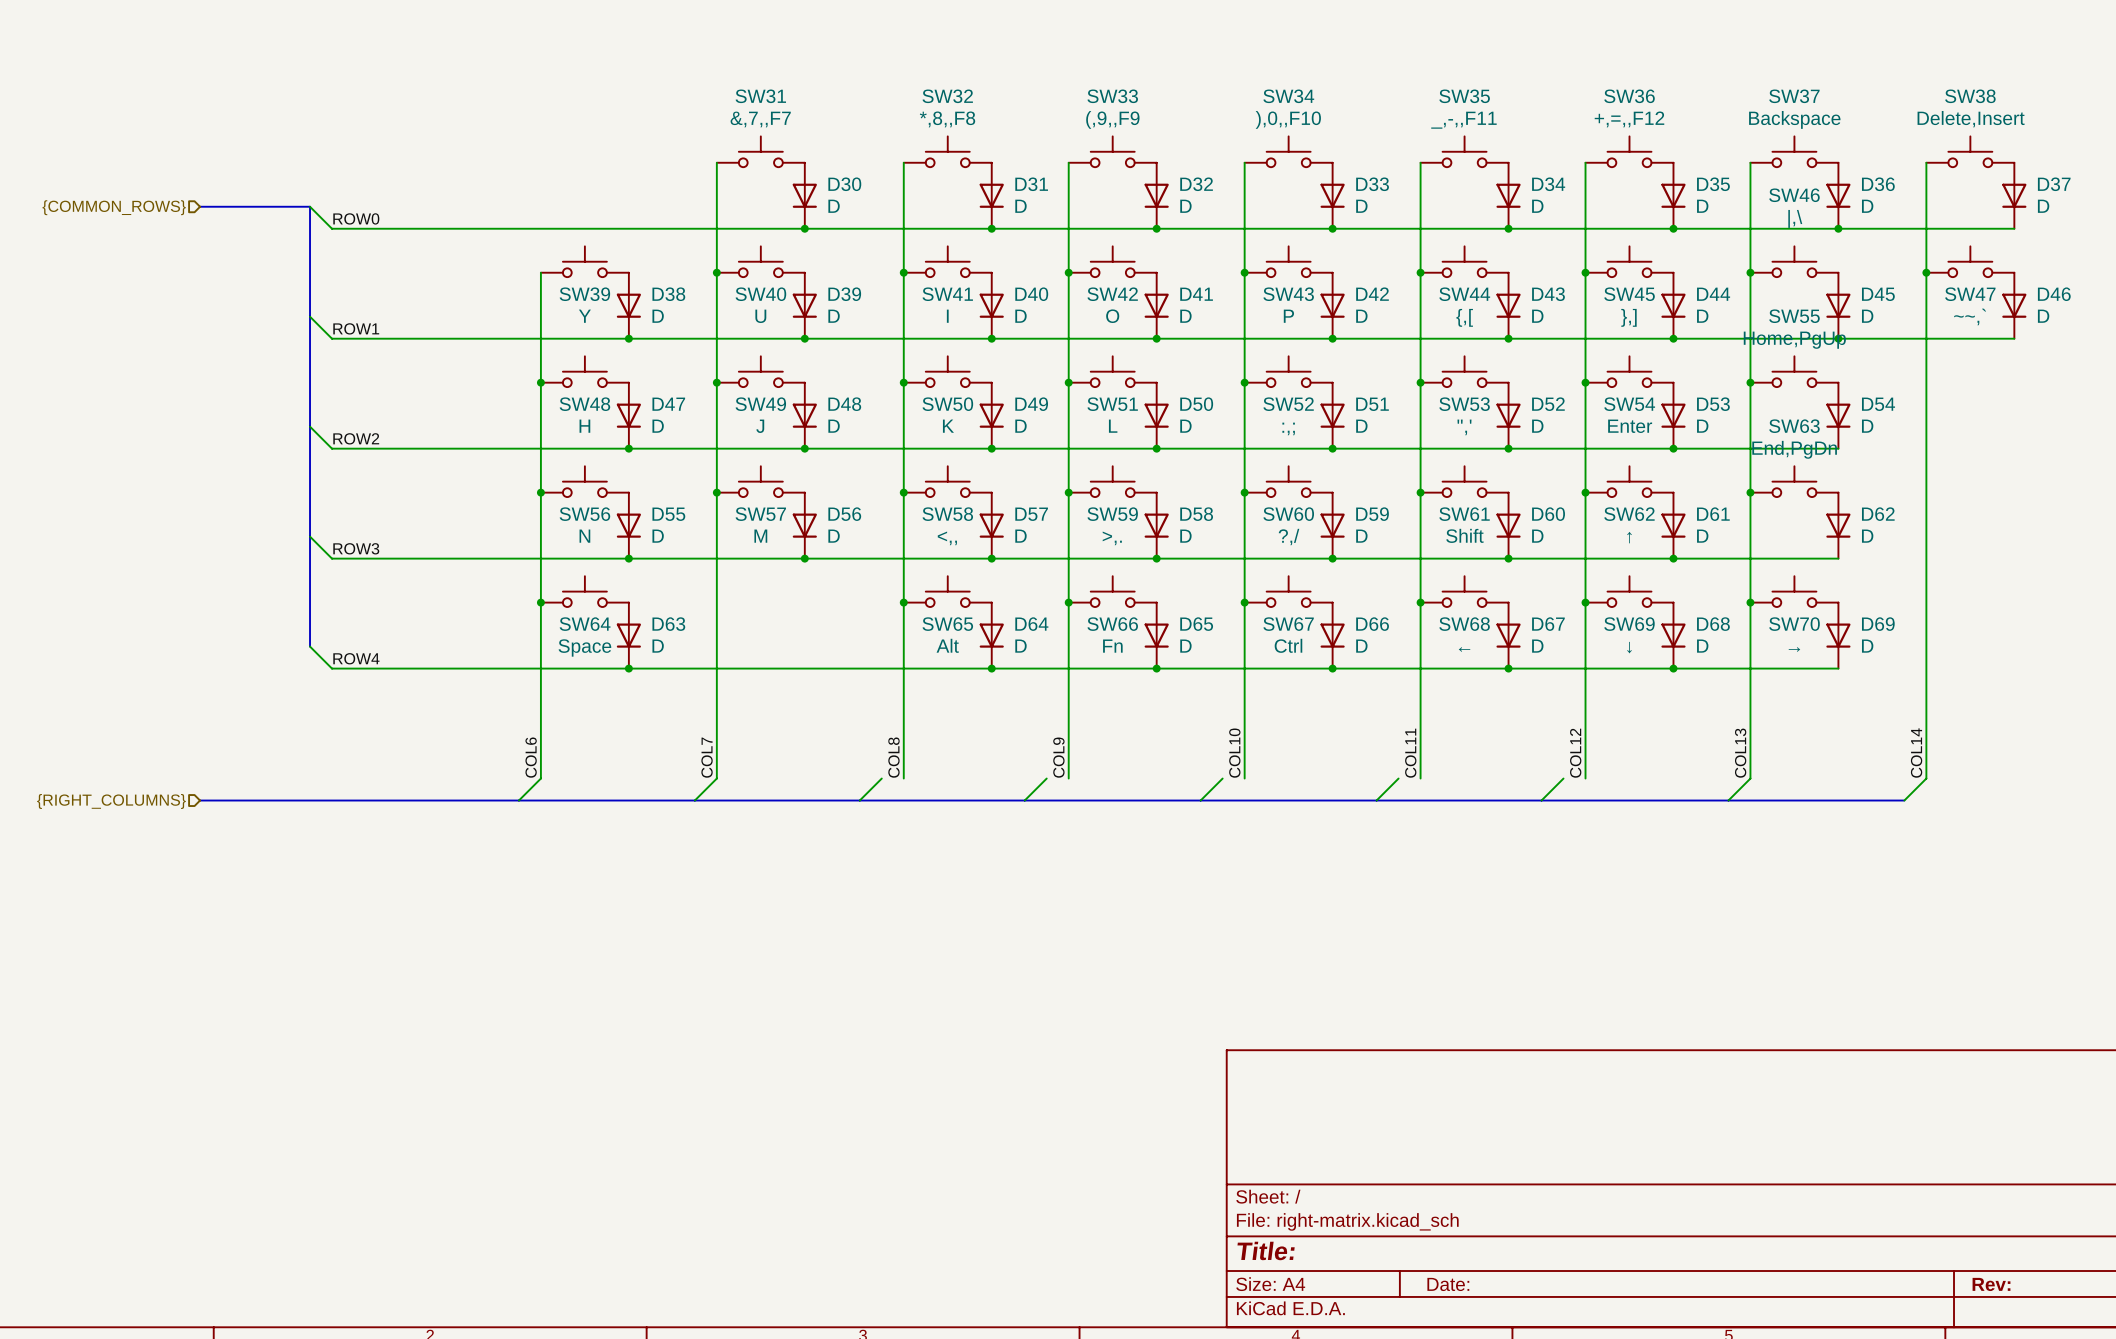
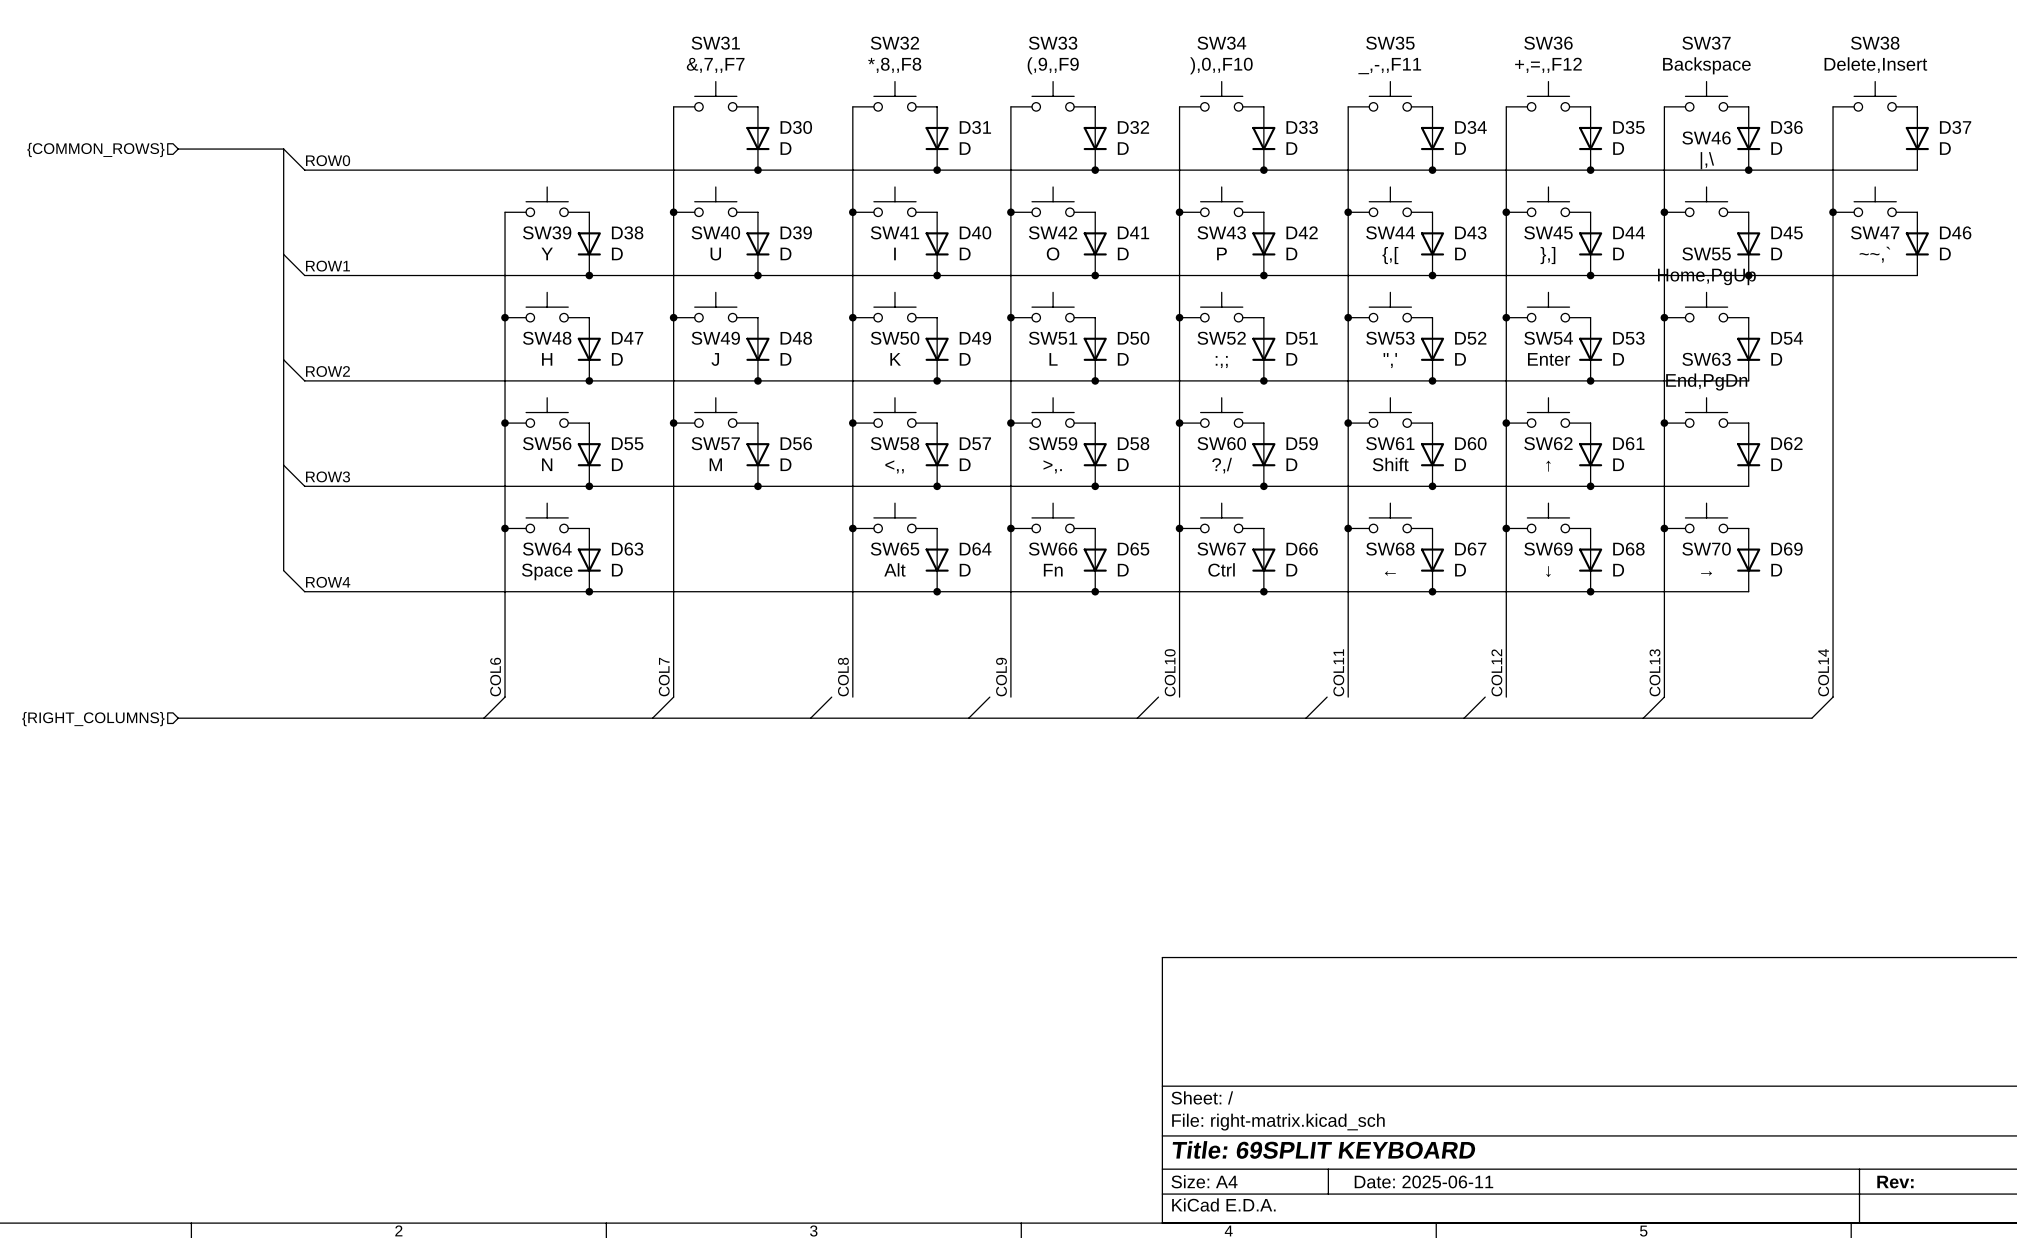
title block: Title: (1266, 1250) -> Title: 69SPLIT KEYBOARD (1324, 1149)
title block: Date: (1448, 1284) -> Date: 2025-06-11 (1423, 1181)

